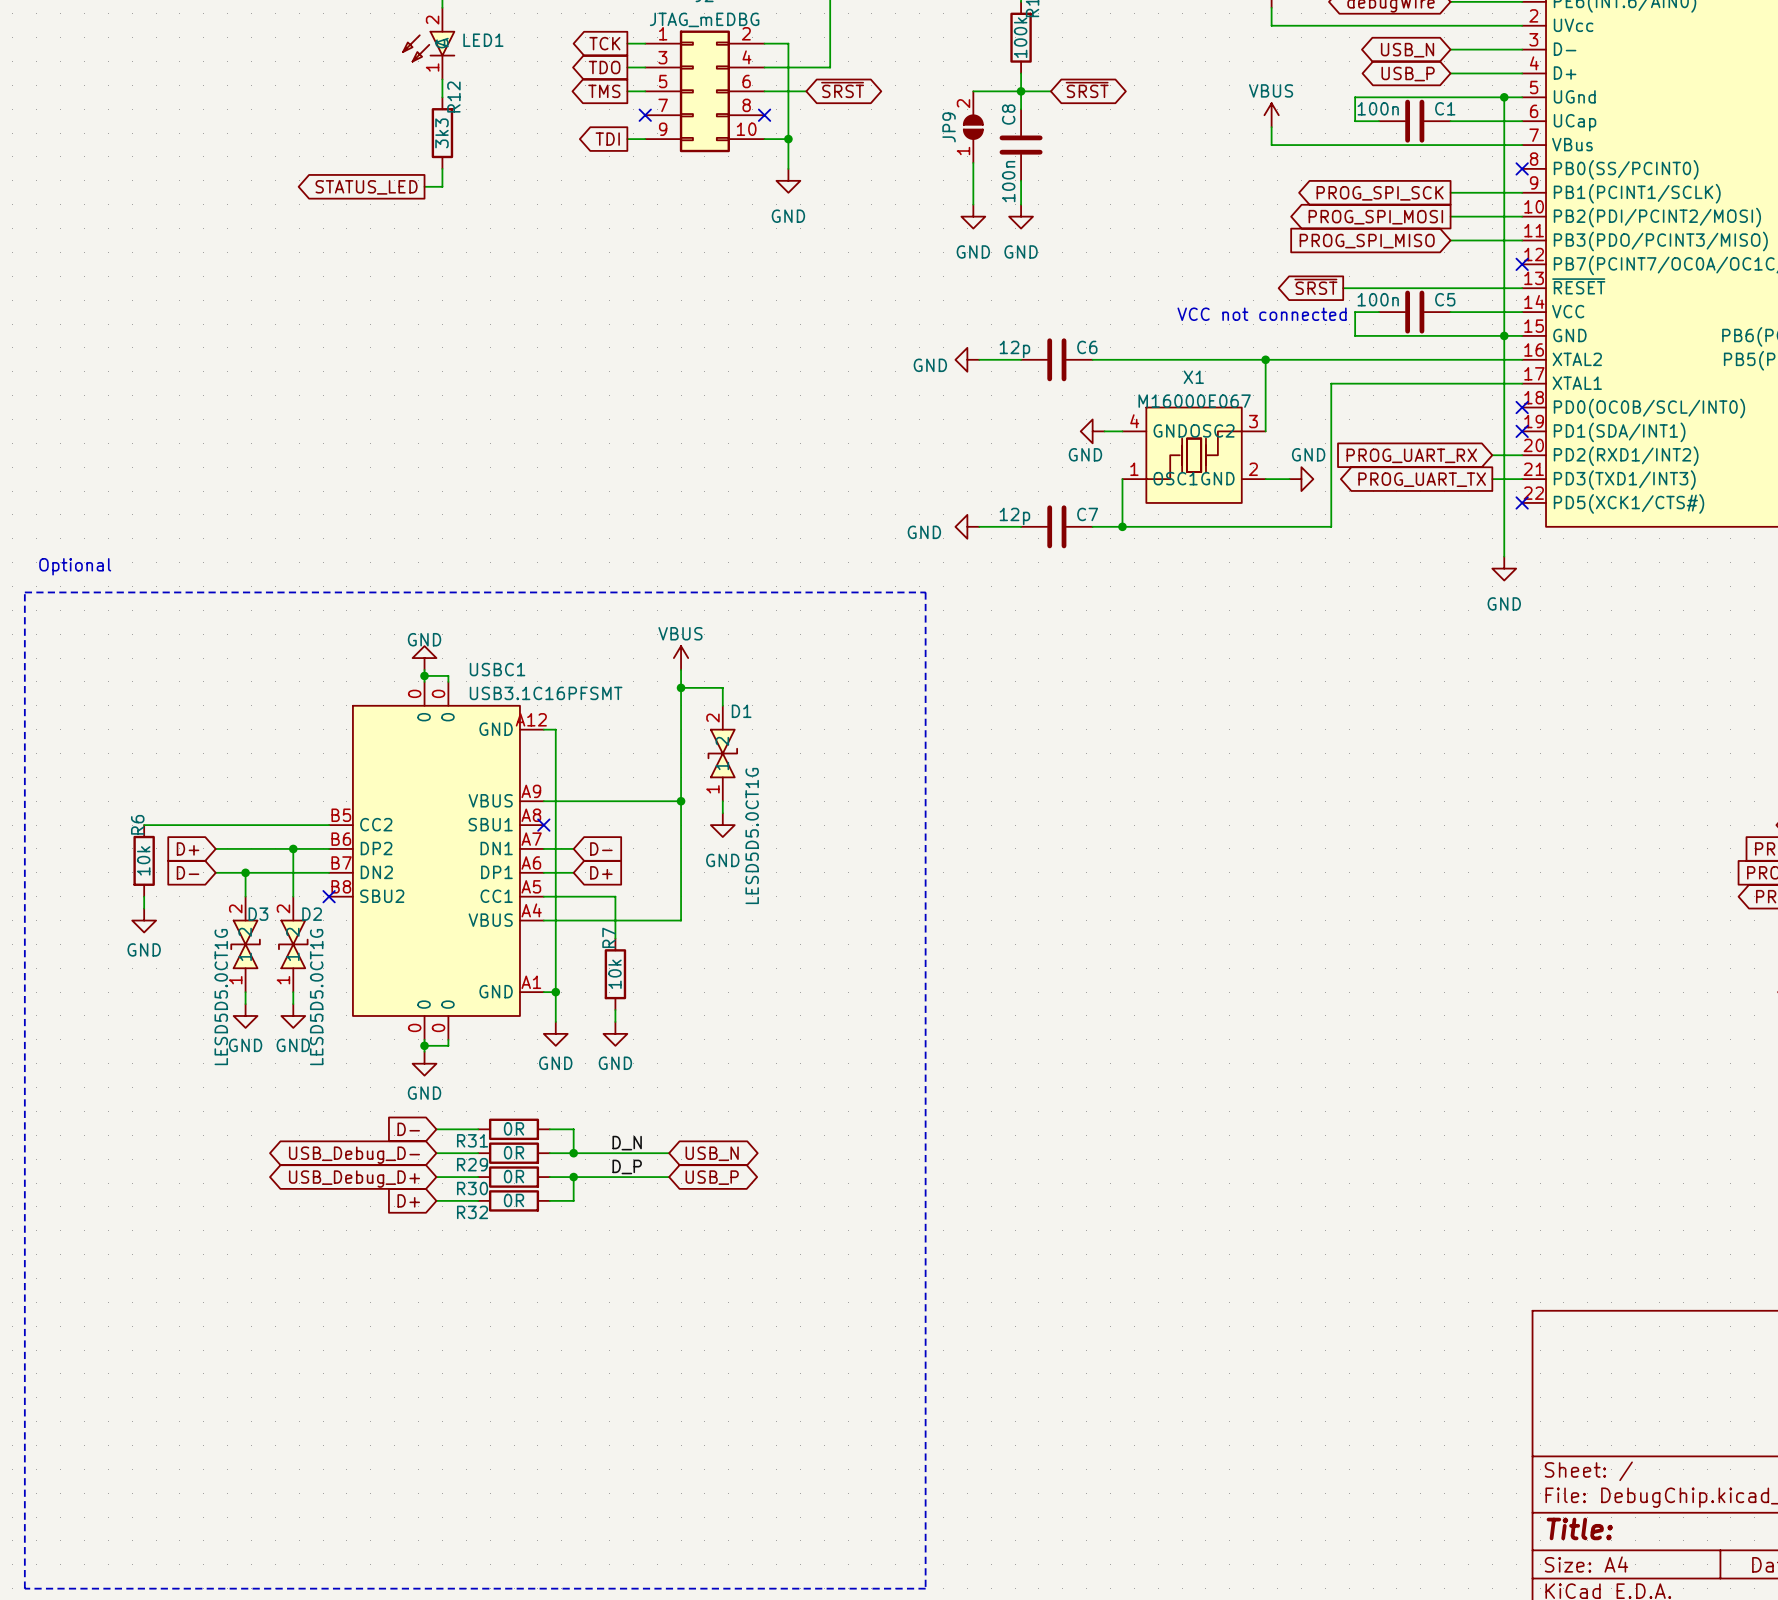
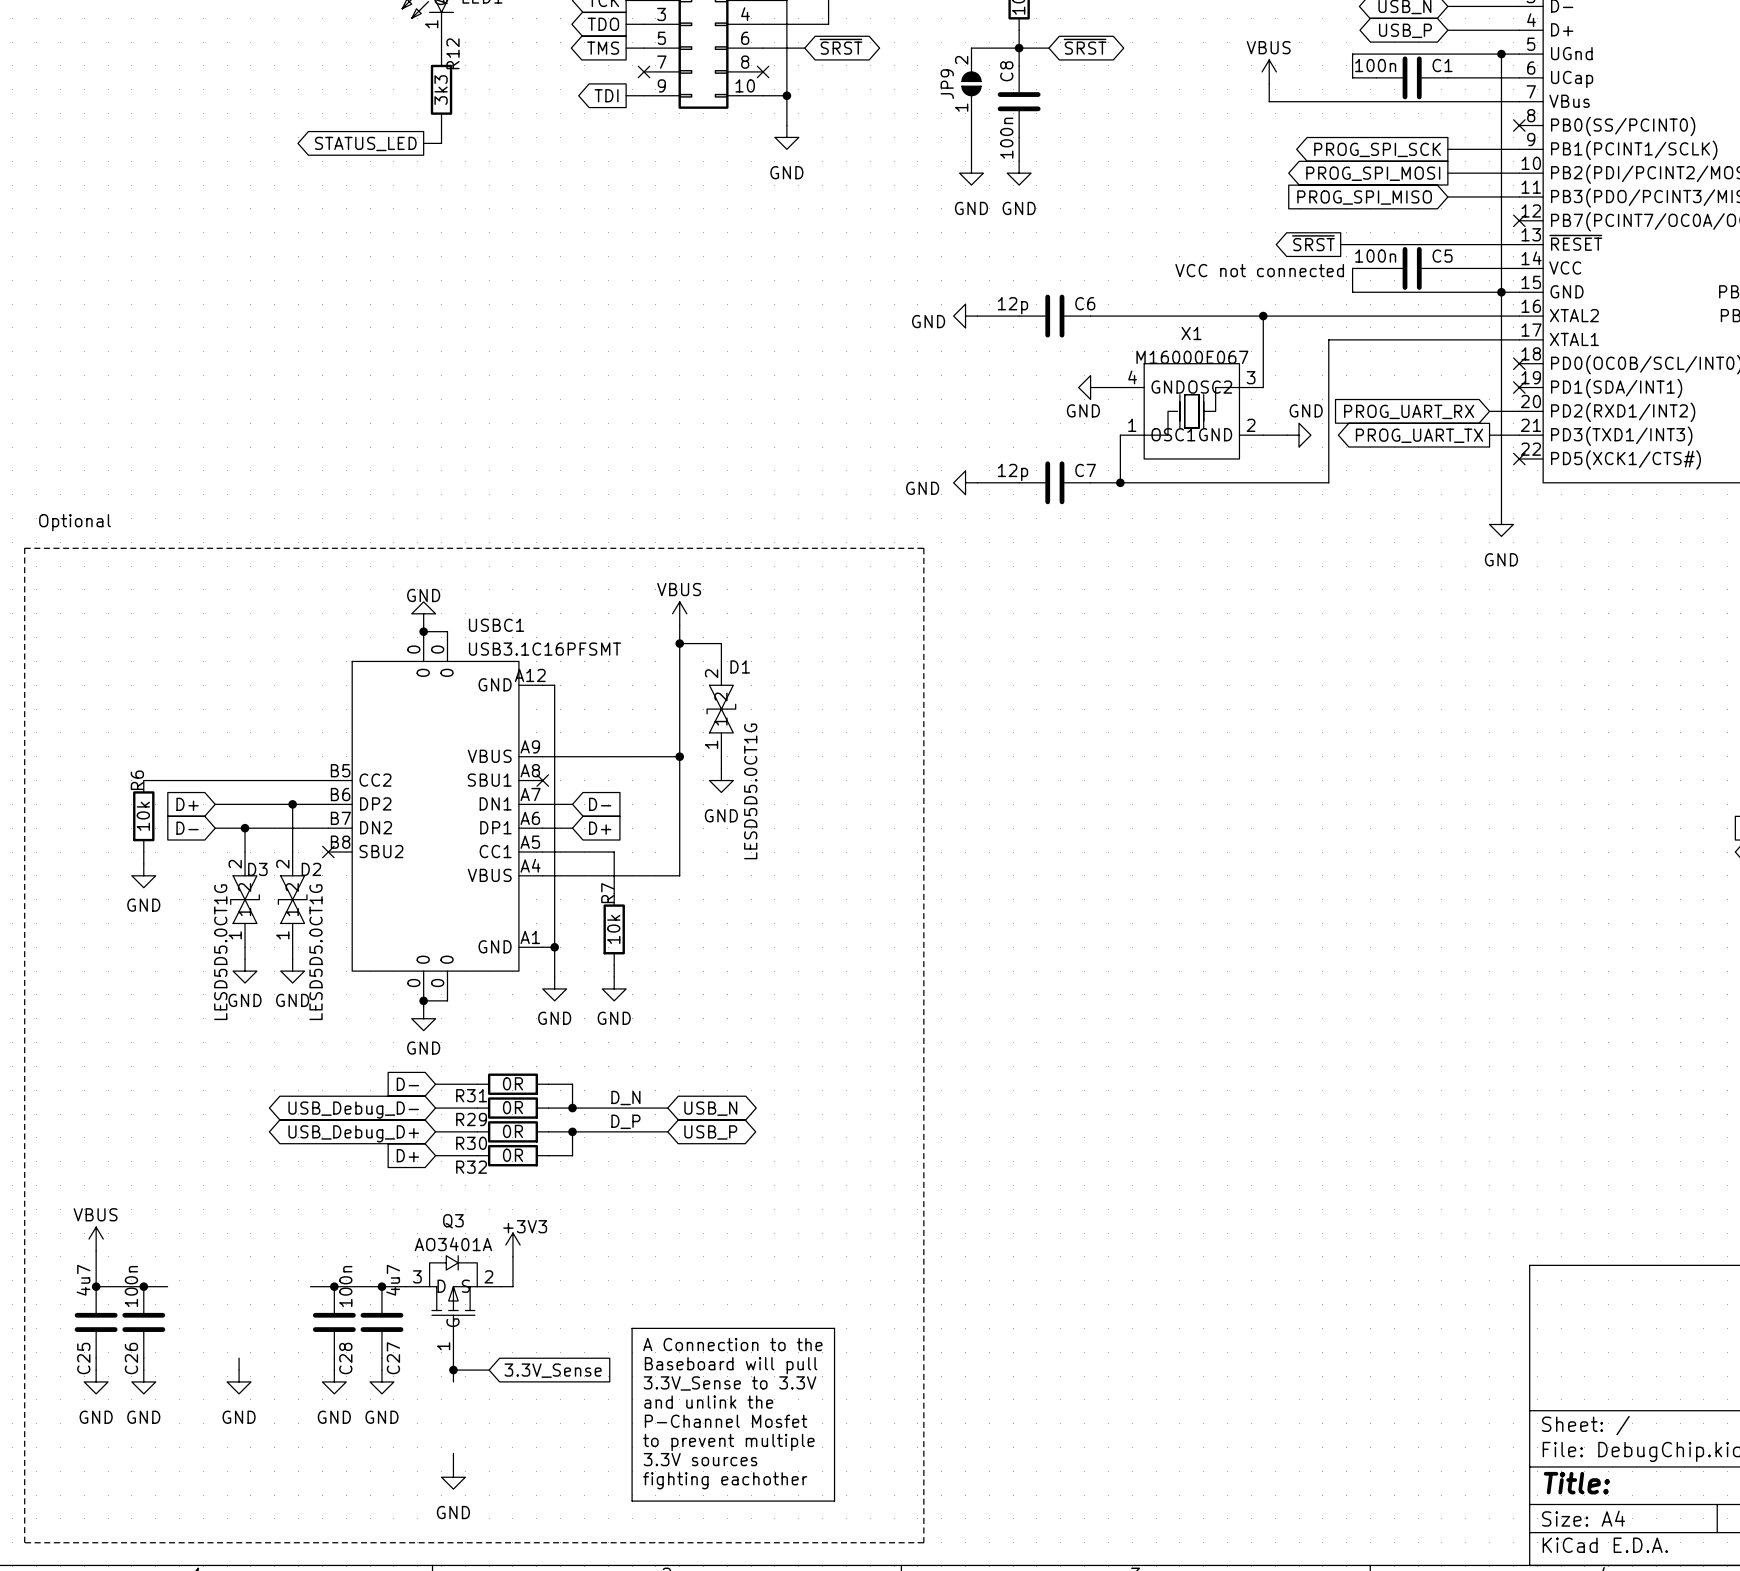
power symbol: none -> VBUS (96, 1239)
power symbol: none -> +3V3 (512, 1245)
wire: none -> (96, 1250) (96, 1286) (167, 1286)
wire: none -> (512, 1256) (512, 1286) (501, 1286)
junction: none -> (96, 1286)
junction: none -> (143, 1286)
wire: none -> (310, 1286) (405, 1286)
junction: none -> (334, 1286)
junction: none -> (381, 1286)
Q3: none -> AO3401A (453, 1306)
C25: none -> 4u7 (96, 1322)
C26: none -> 100n (143, 1322)
C28: none -> 100n (334, 1322)
C27: none -> 4u7 (381, 1322)
line: none -> (632, 1328) (834, 1328) (834, 1501) (632, 1501) (632, 1328)
text: none -> A Connection to the (732, 1344)
wire: none -> (96, 1358) (96, 1370)
wire: none -> (143, 1358) (143, 1370)
wire: none -> (239, 1358) (239, 1370)
wire: none -> (334, 1358) (334, 1370)
wire: none -> (381, 1358) (381, 1370)
wire: none -> (453, 1358) (453, 1381)
text: none -> Baseboard will pull (731, 1365)
wire: none -> (453, 1370) (489, 1370)
junction: none -> (453, 1370)
global label: none -> 3.3V_Sense (553, 1370)
power symbol: none -> GND (96, 1381)
power symbol: none -> GND (143, 1381)
power symbol: none -> GND (239, 1381)
power symbol: none -> GND (334, 1381)
power symbol: none -> GND (381, 1381)
text: none -> 3.3V_Sense to 3.3V (729, 1383)
text: none -> and unlink the (708, 1402)
text: none -> P-Channel Mosfet (726, 1421)
text: none -> to prevent multiple (728, 1442)
wire: none -> (453, 1453) (453, 1465)
text: none -> 3.3V sources (700, 1459)
power symbol: none -> GND (453, 1477)
text: none -> fighting eachother (725, 1480)

